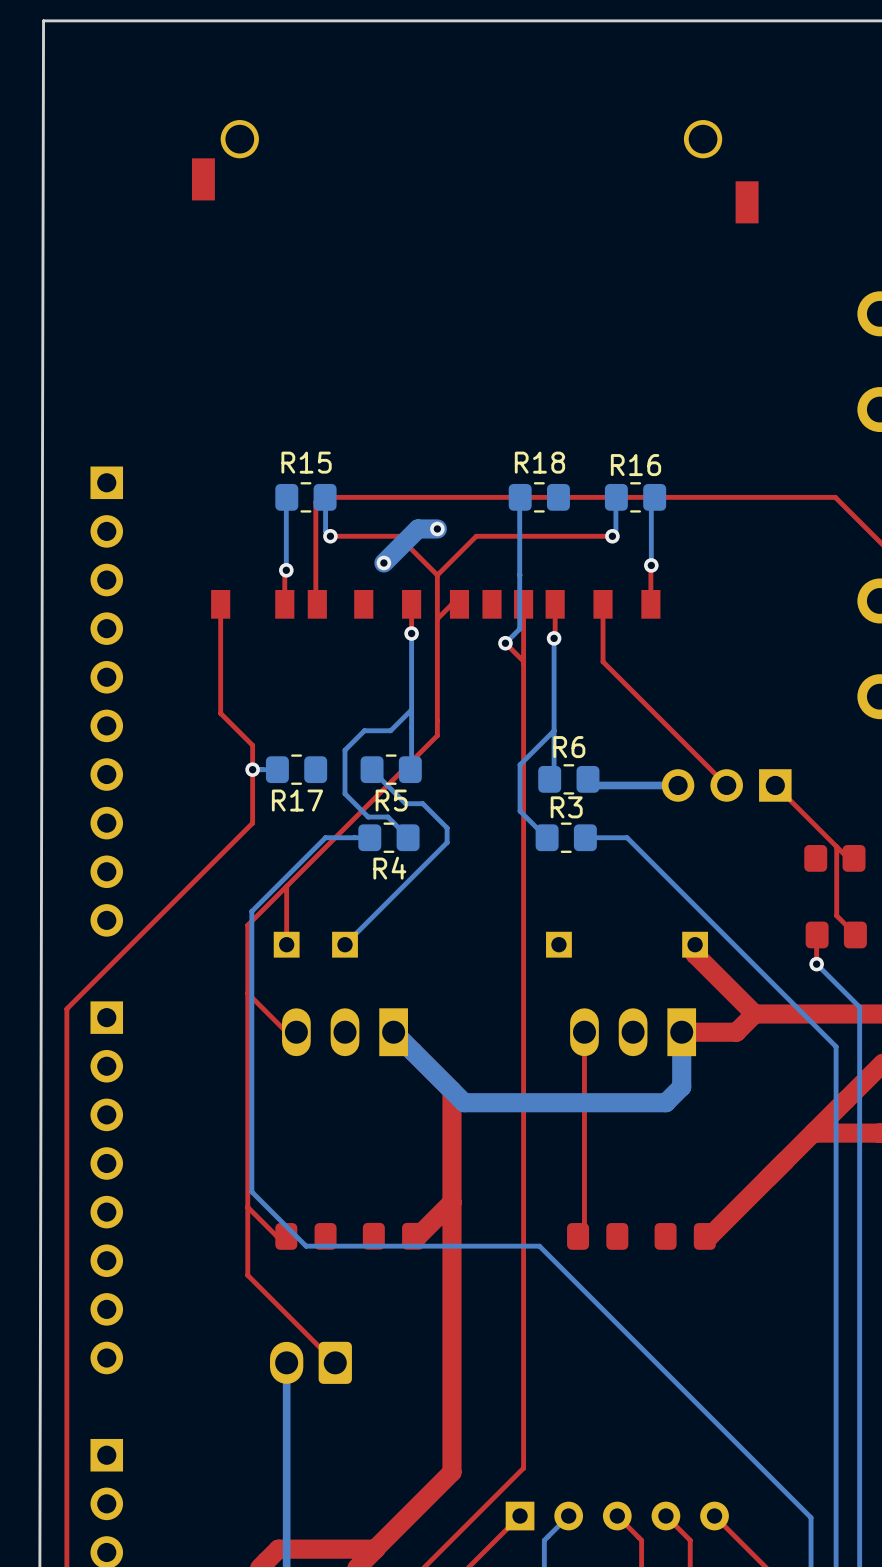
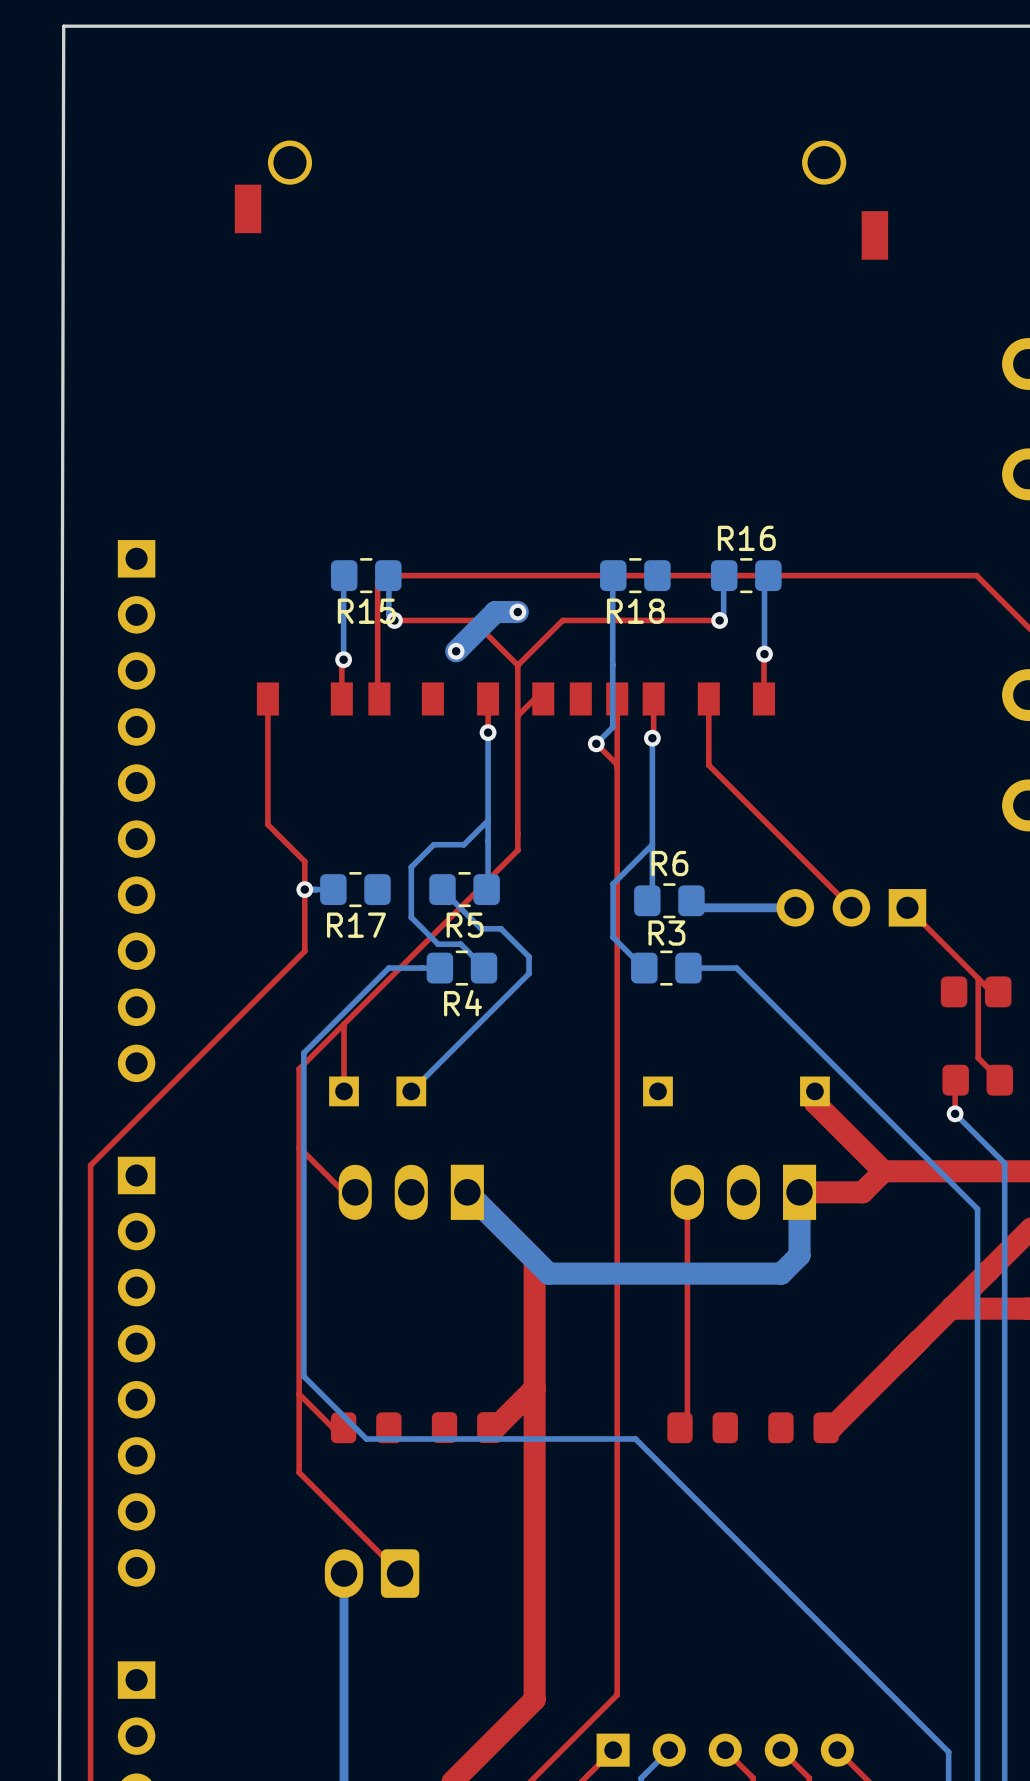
R15 name position: R15 (306, 462) -> R15 (366, 611)
R18 name position: R18 (539, 462) -> R18 (635, 611)

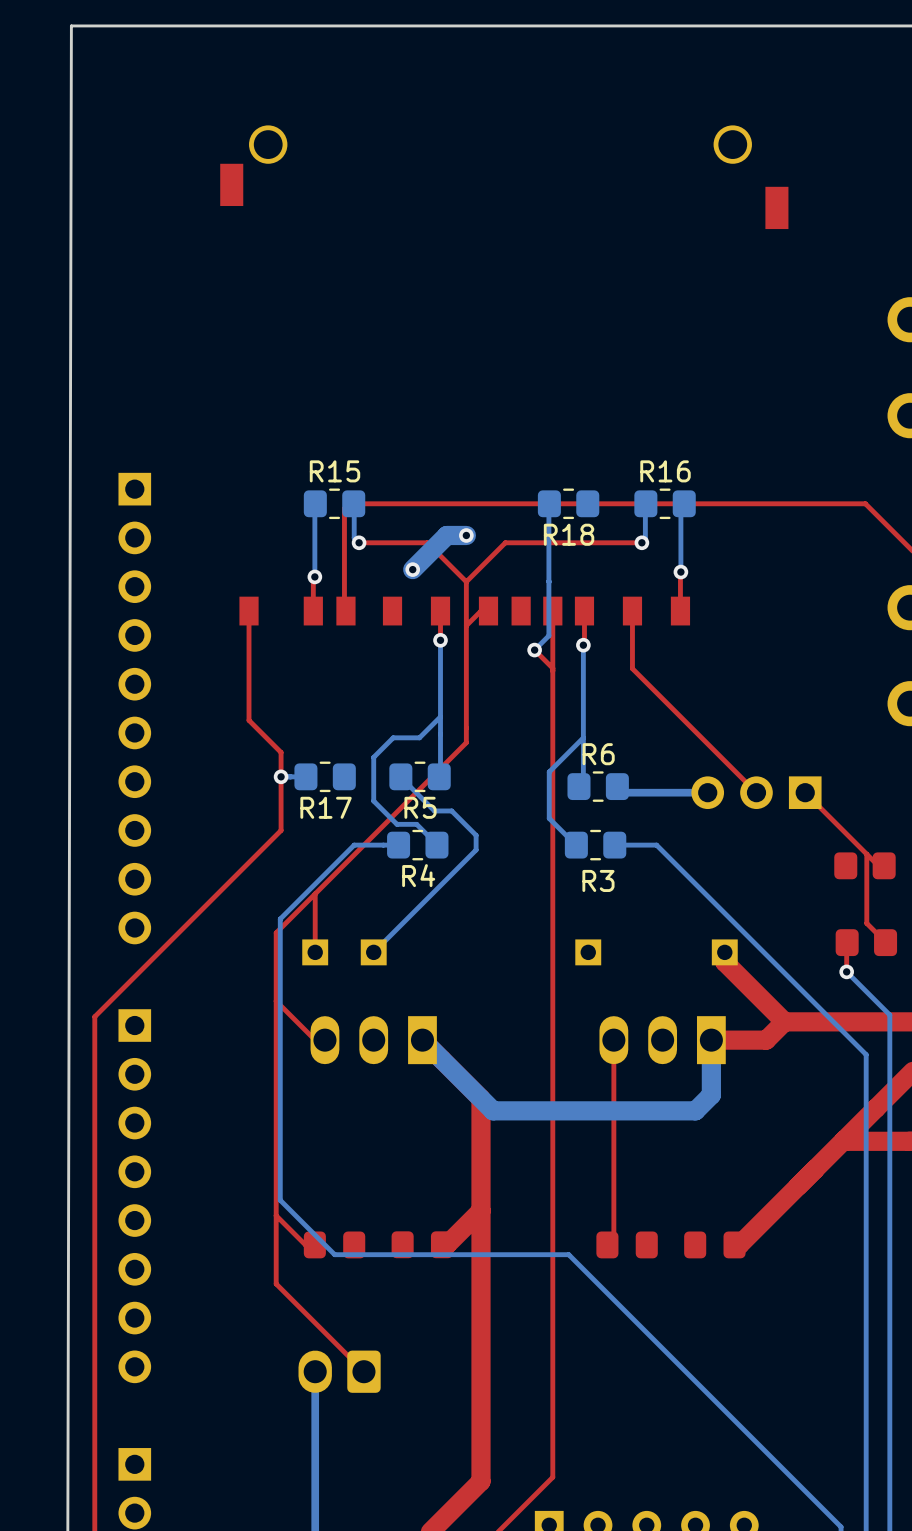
R15 name position: R15 (366, 611) -> R15 (334, 471)
R3 name position: R3 (666, 933) -> R3 (598, 880)

